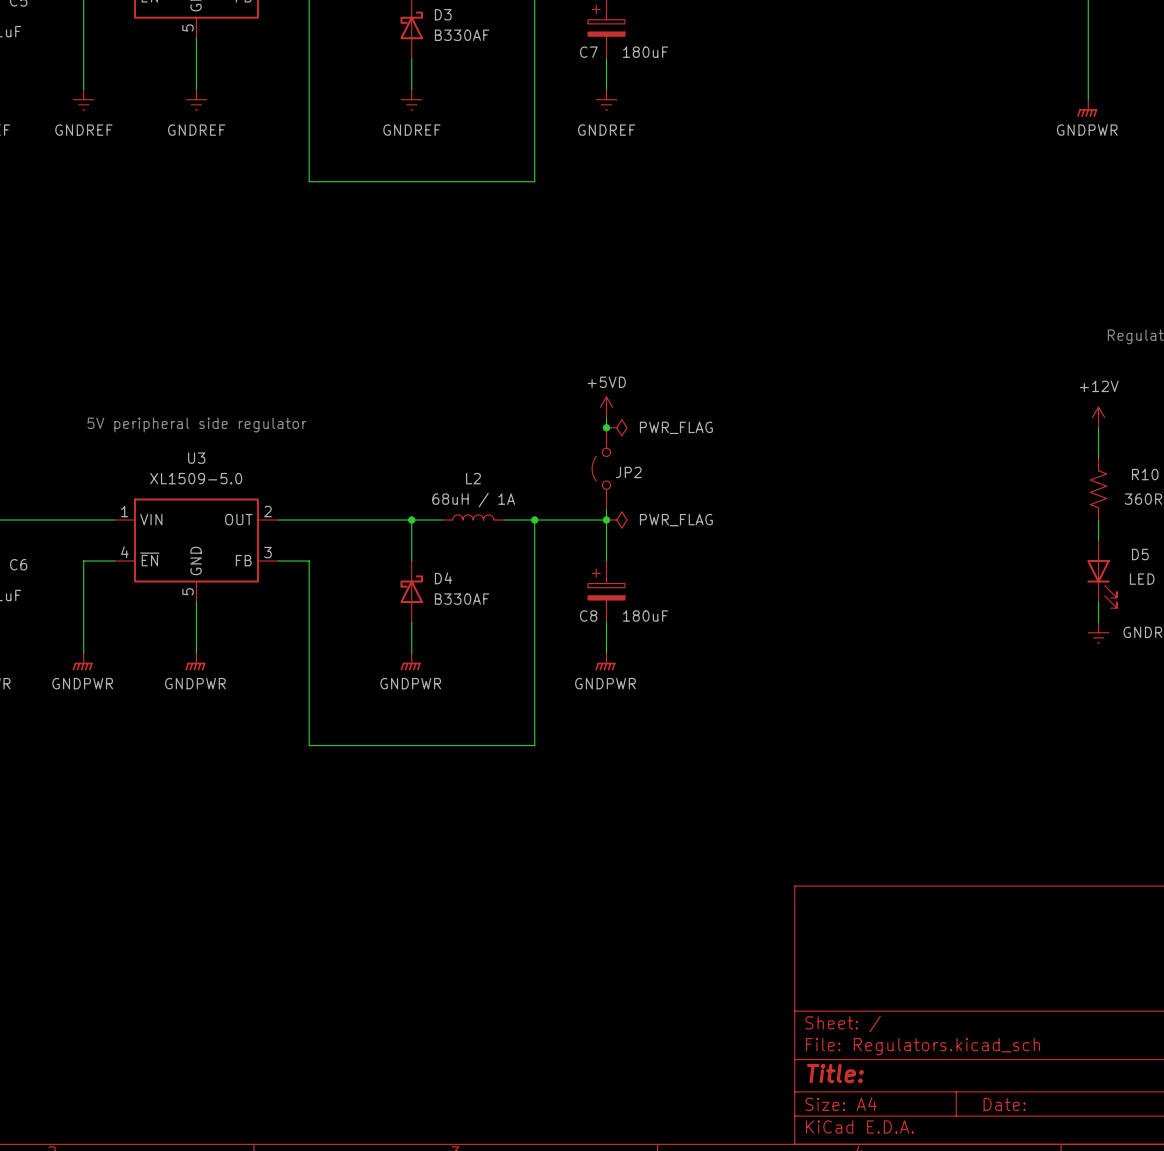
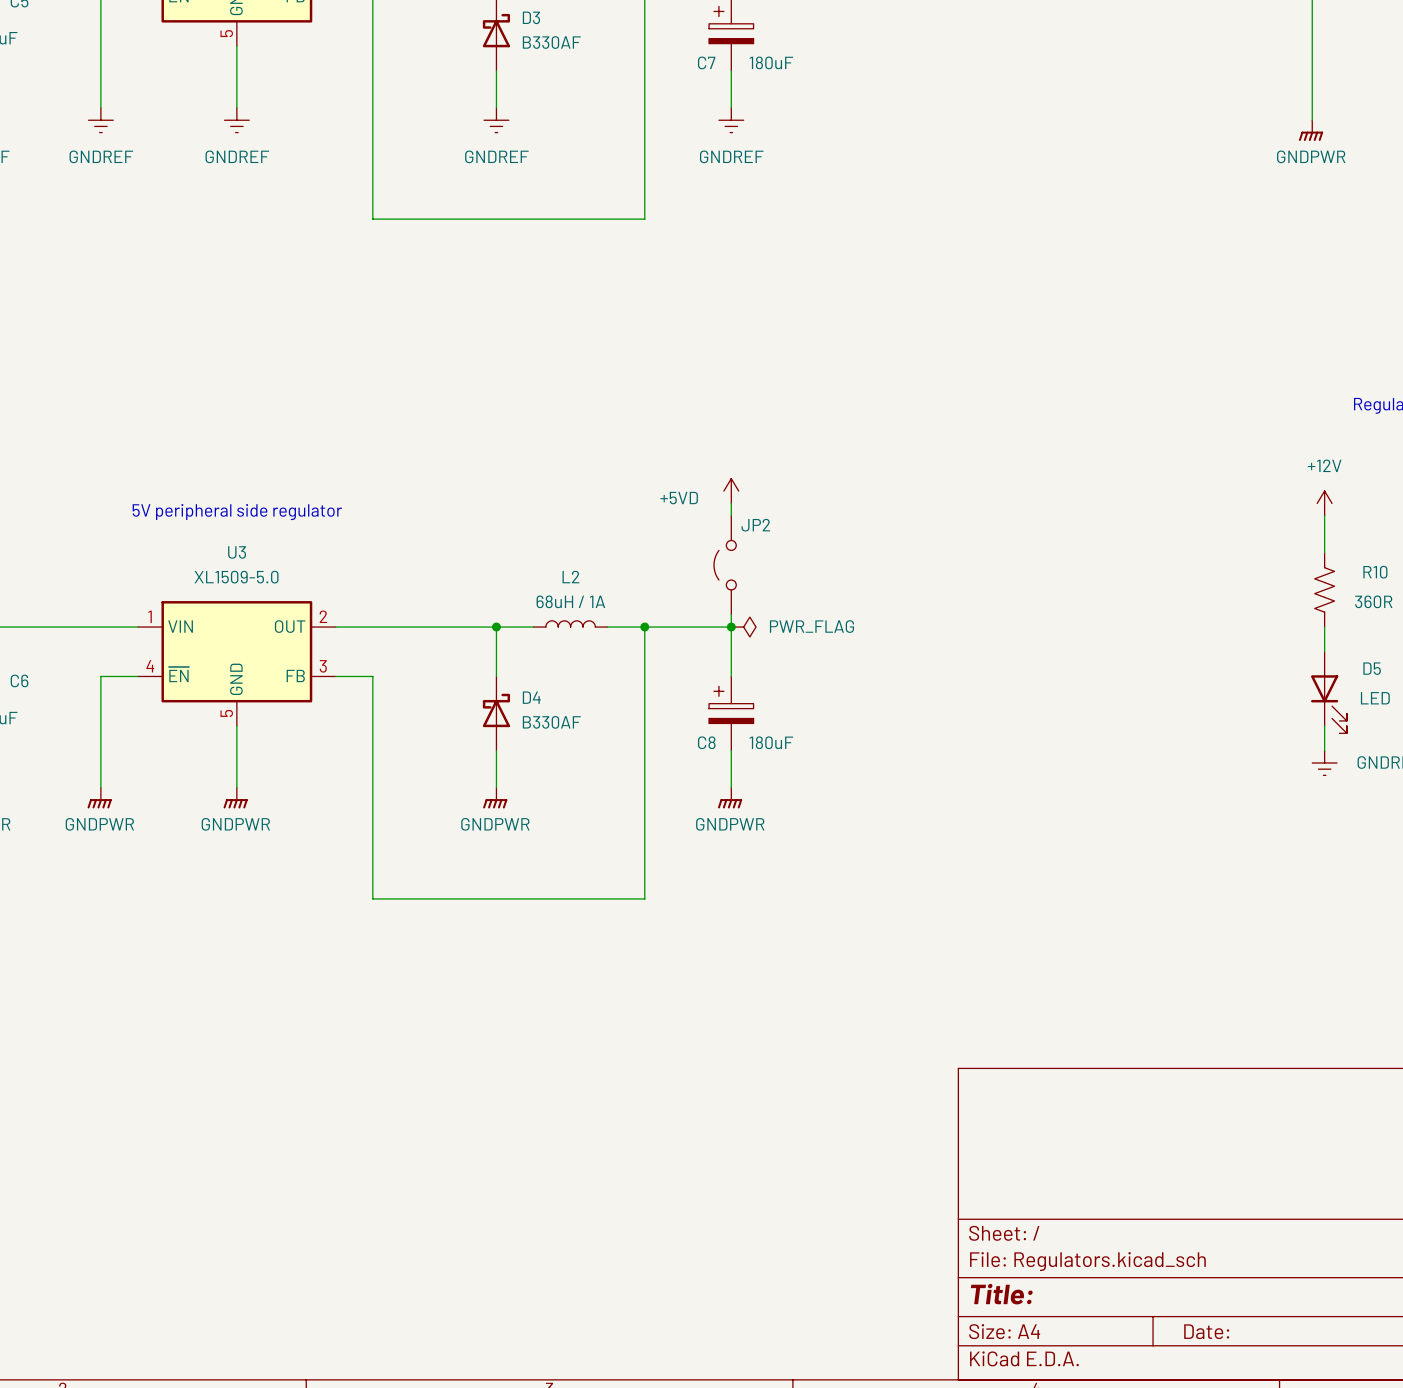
power symbol text position: +5VD (606, 382) -> +5VD (679, 498)
junction: (606, 427) -> none
power symbol: PWR_FLAG (616, 427) -> none
JP2 name position: JP2 (628, 472) -> JP2 (755, 525)

